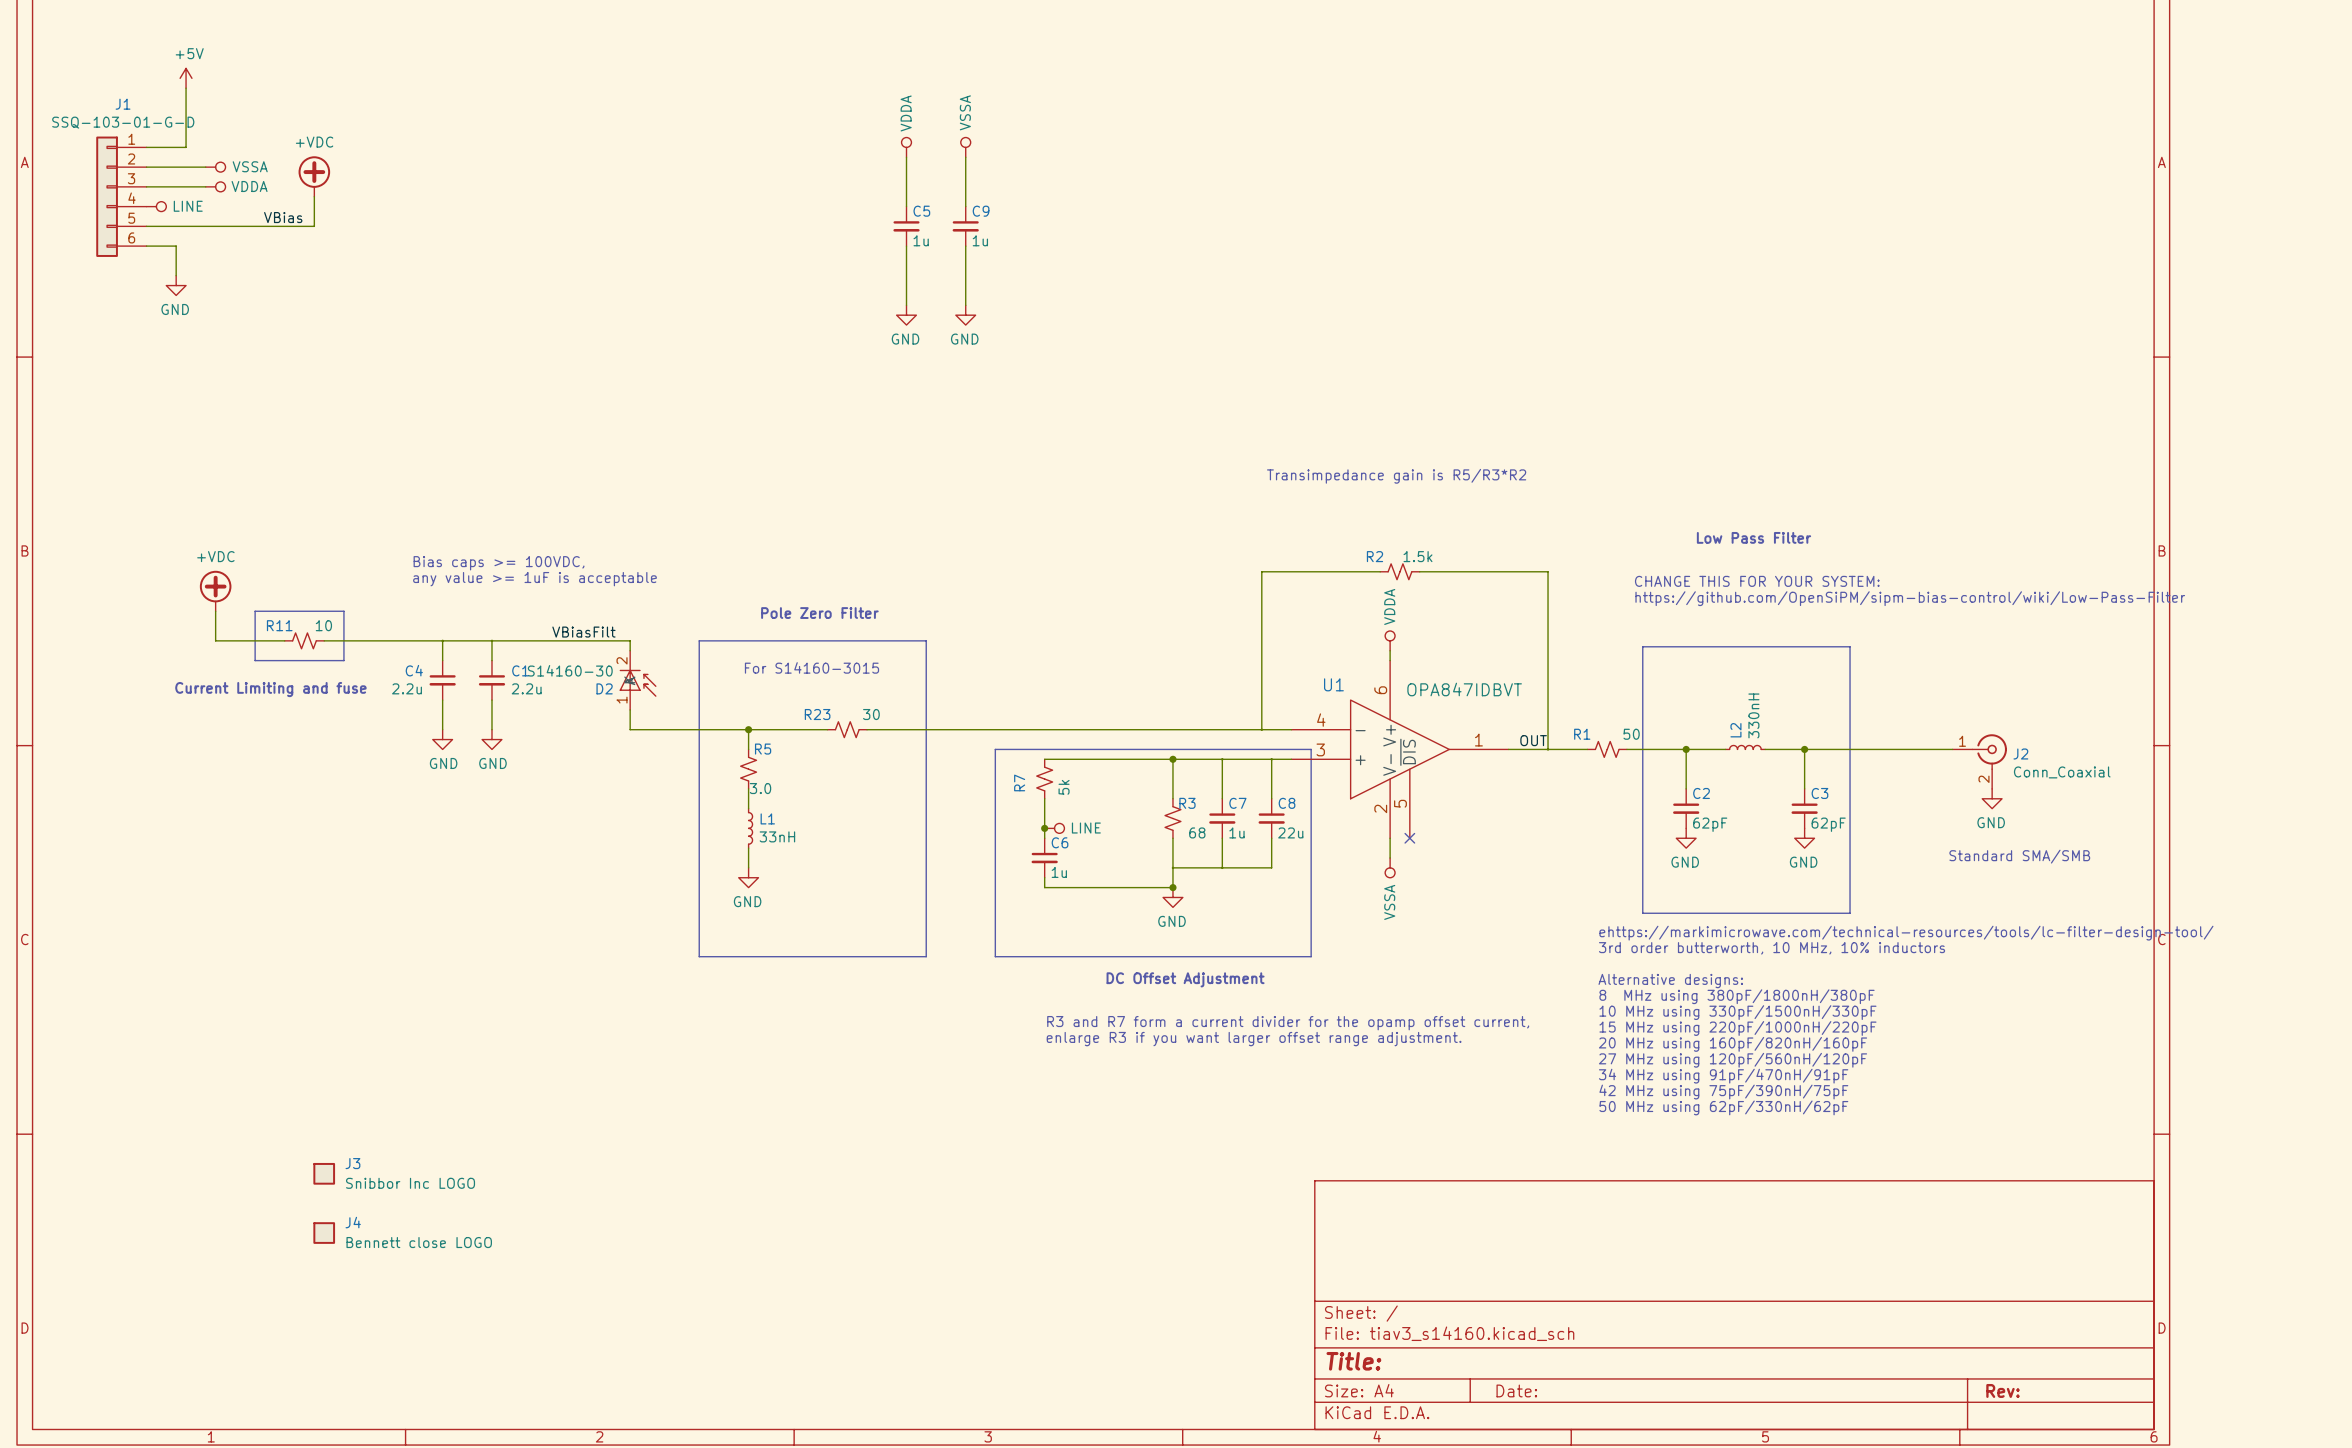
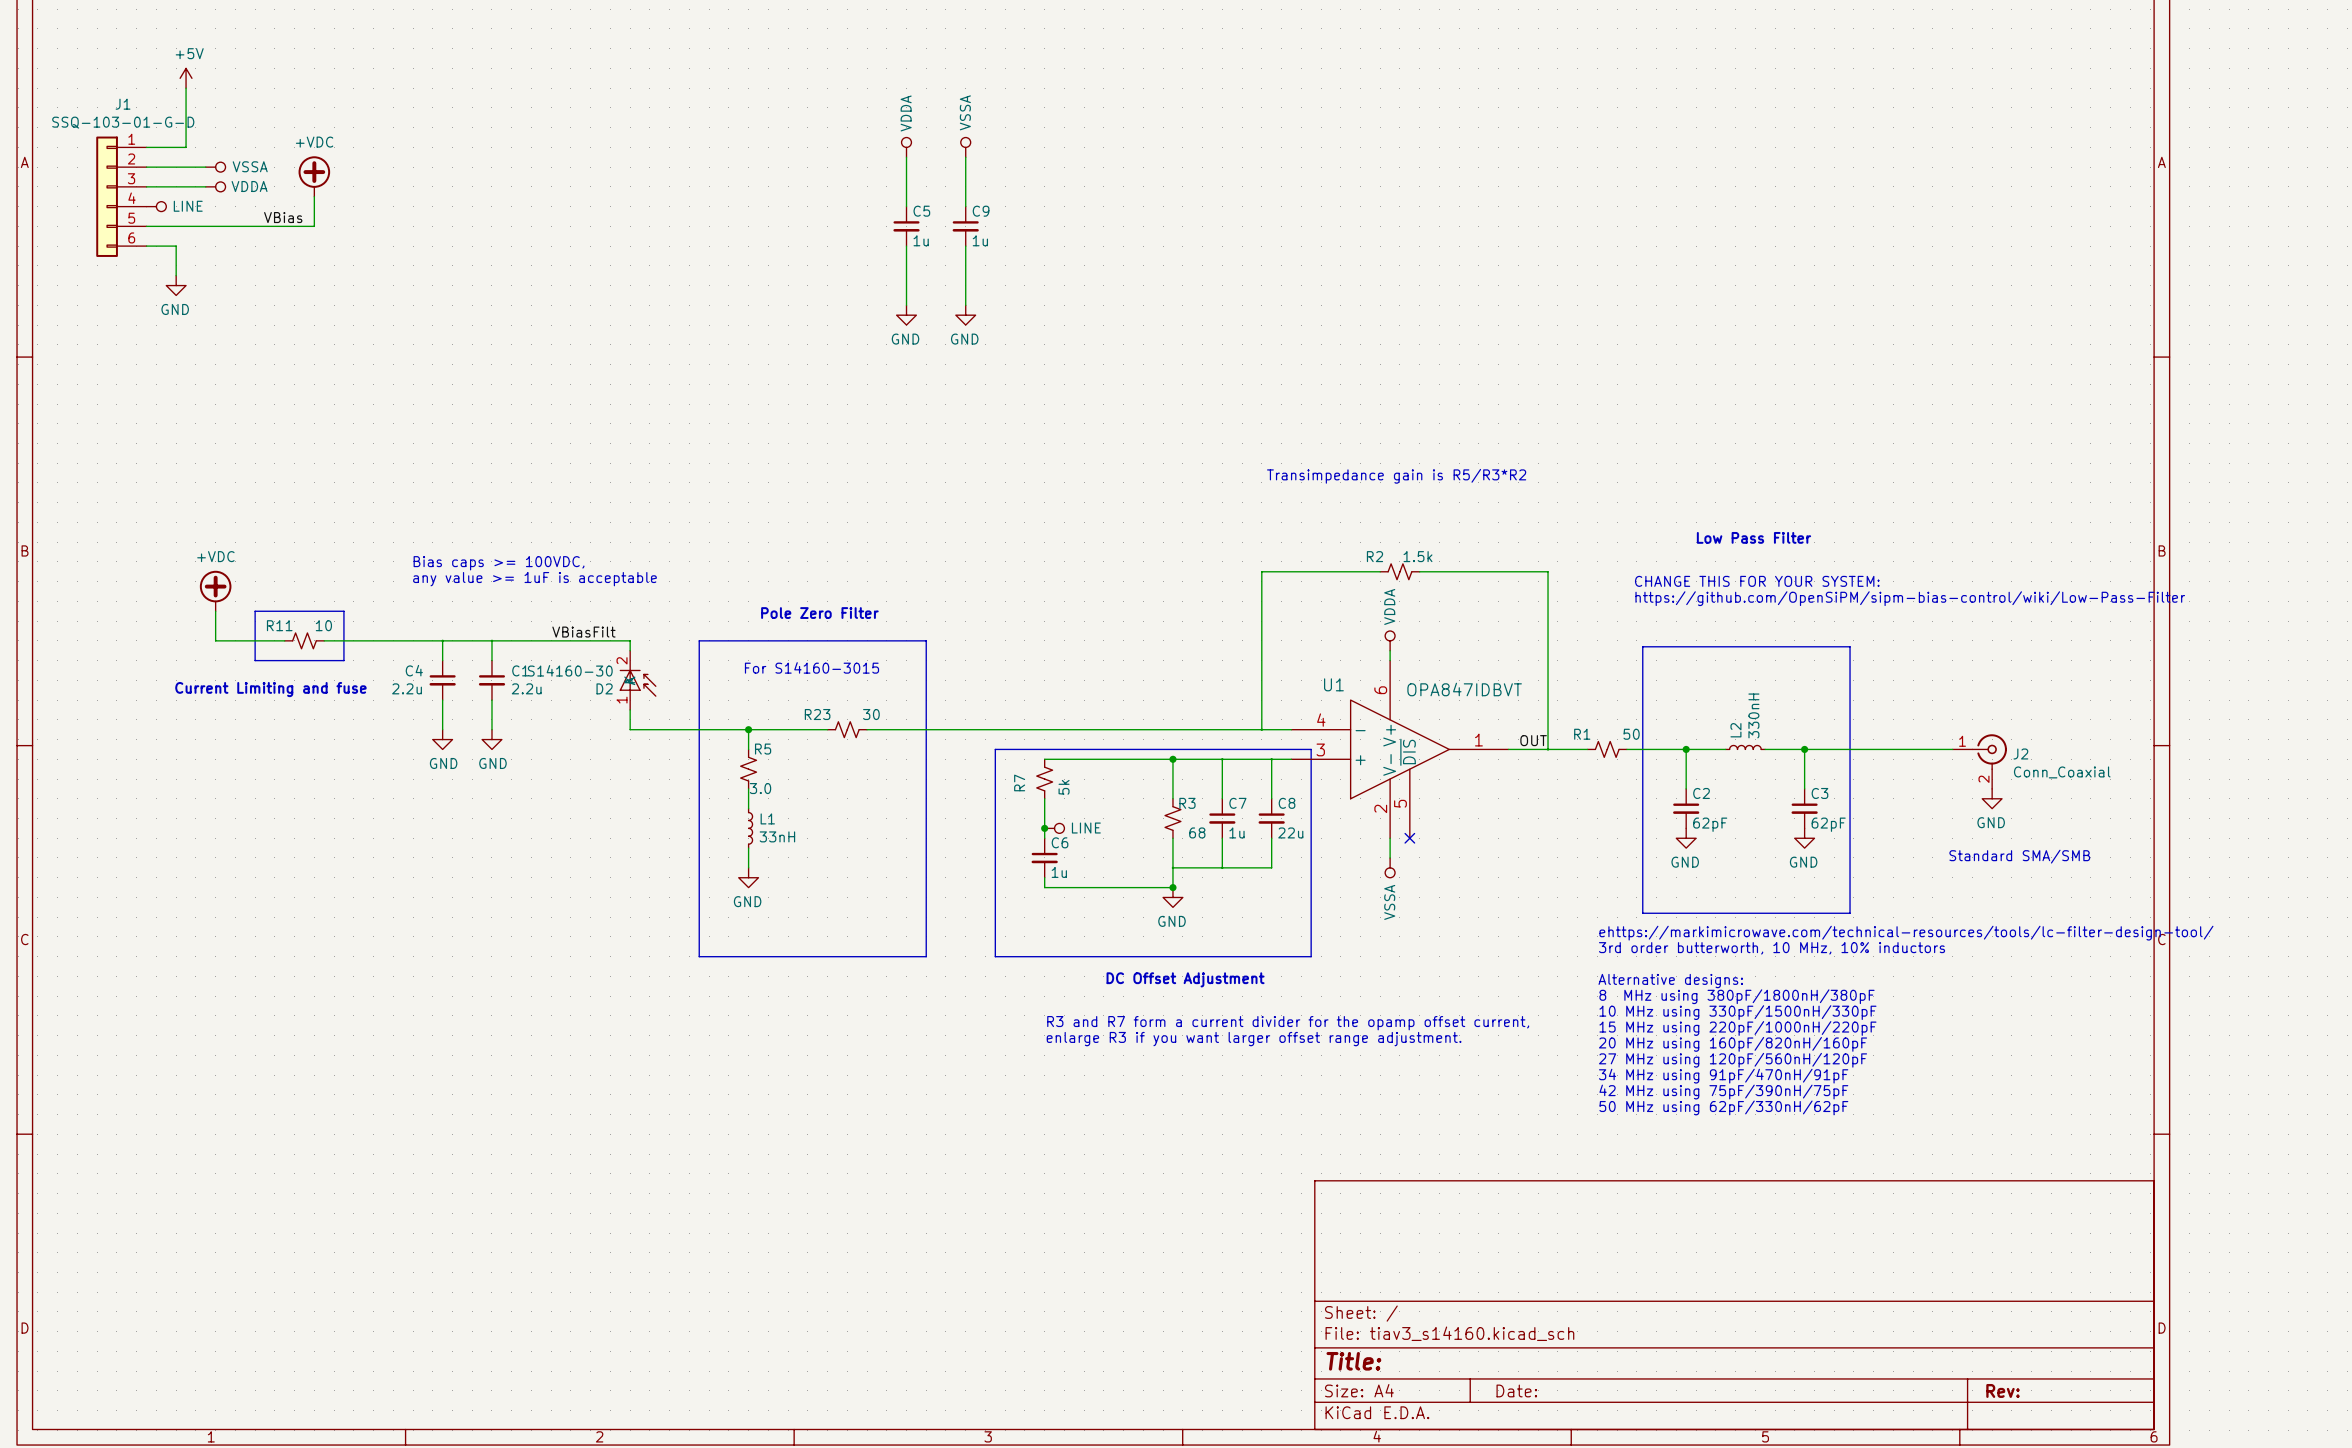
J3: Snibbor Inc LOGO (324, 1173) -> none
J4: Bennett close LOGO (324, 1233) -> none

